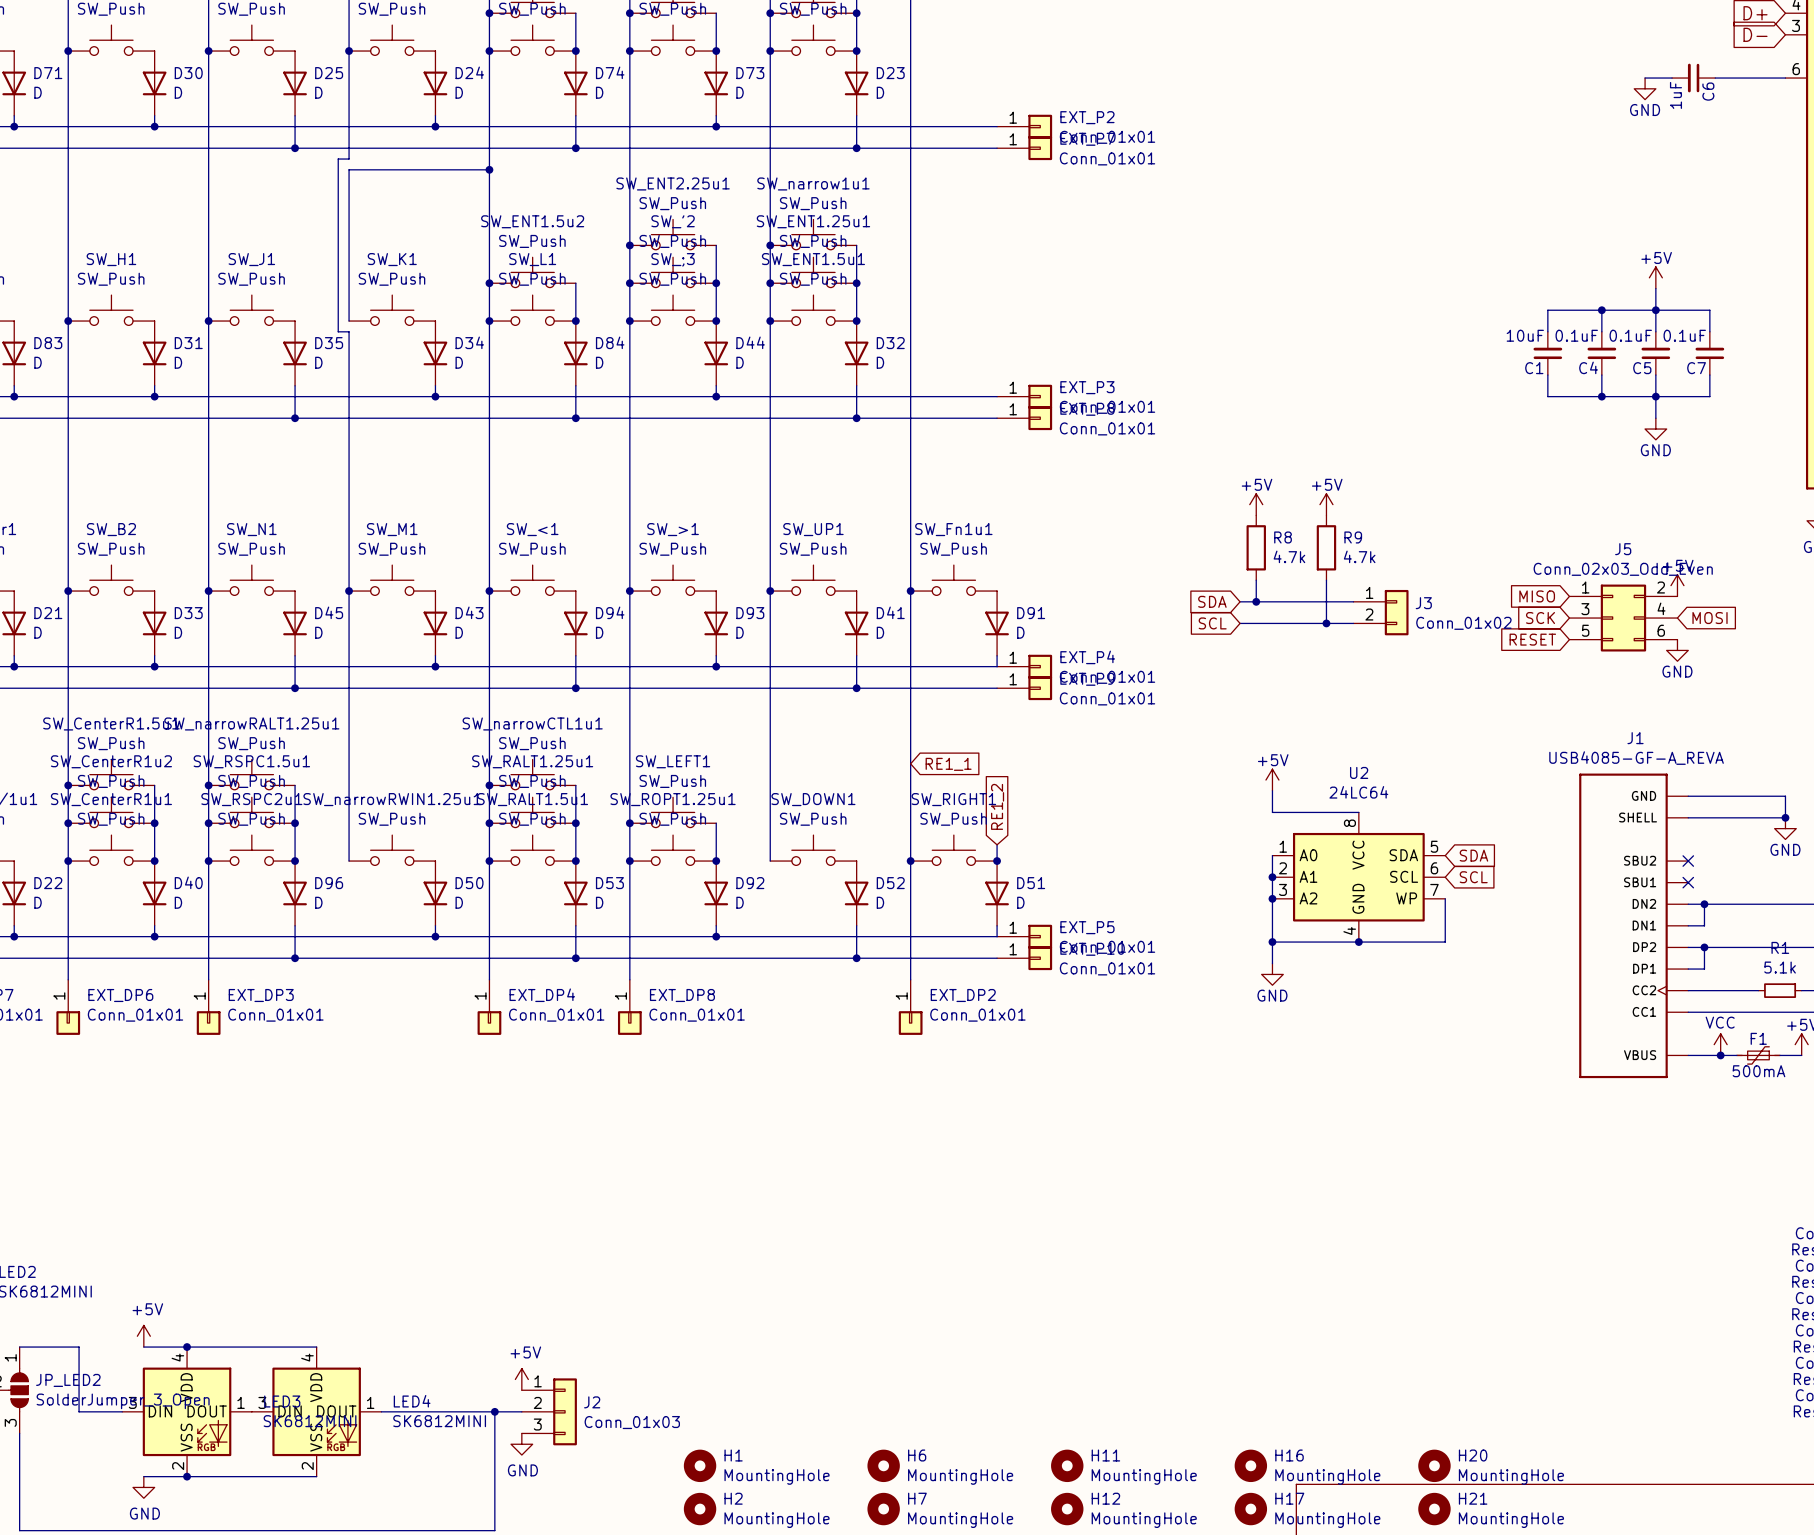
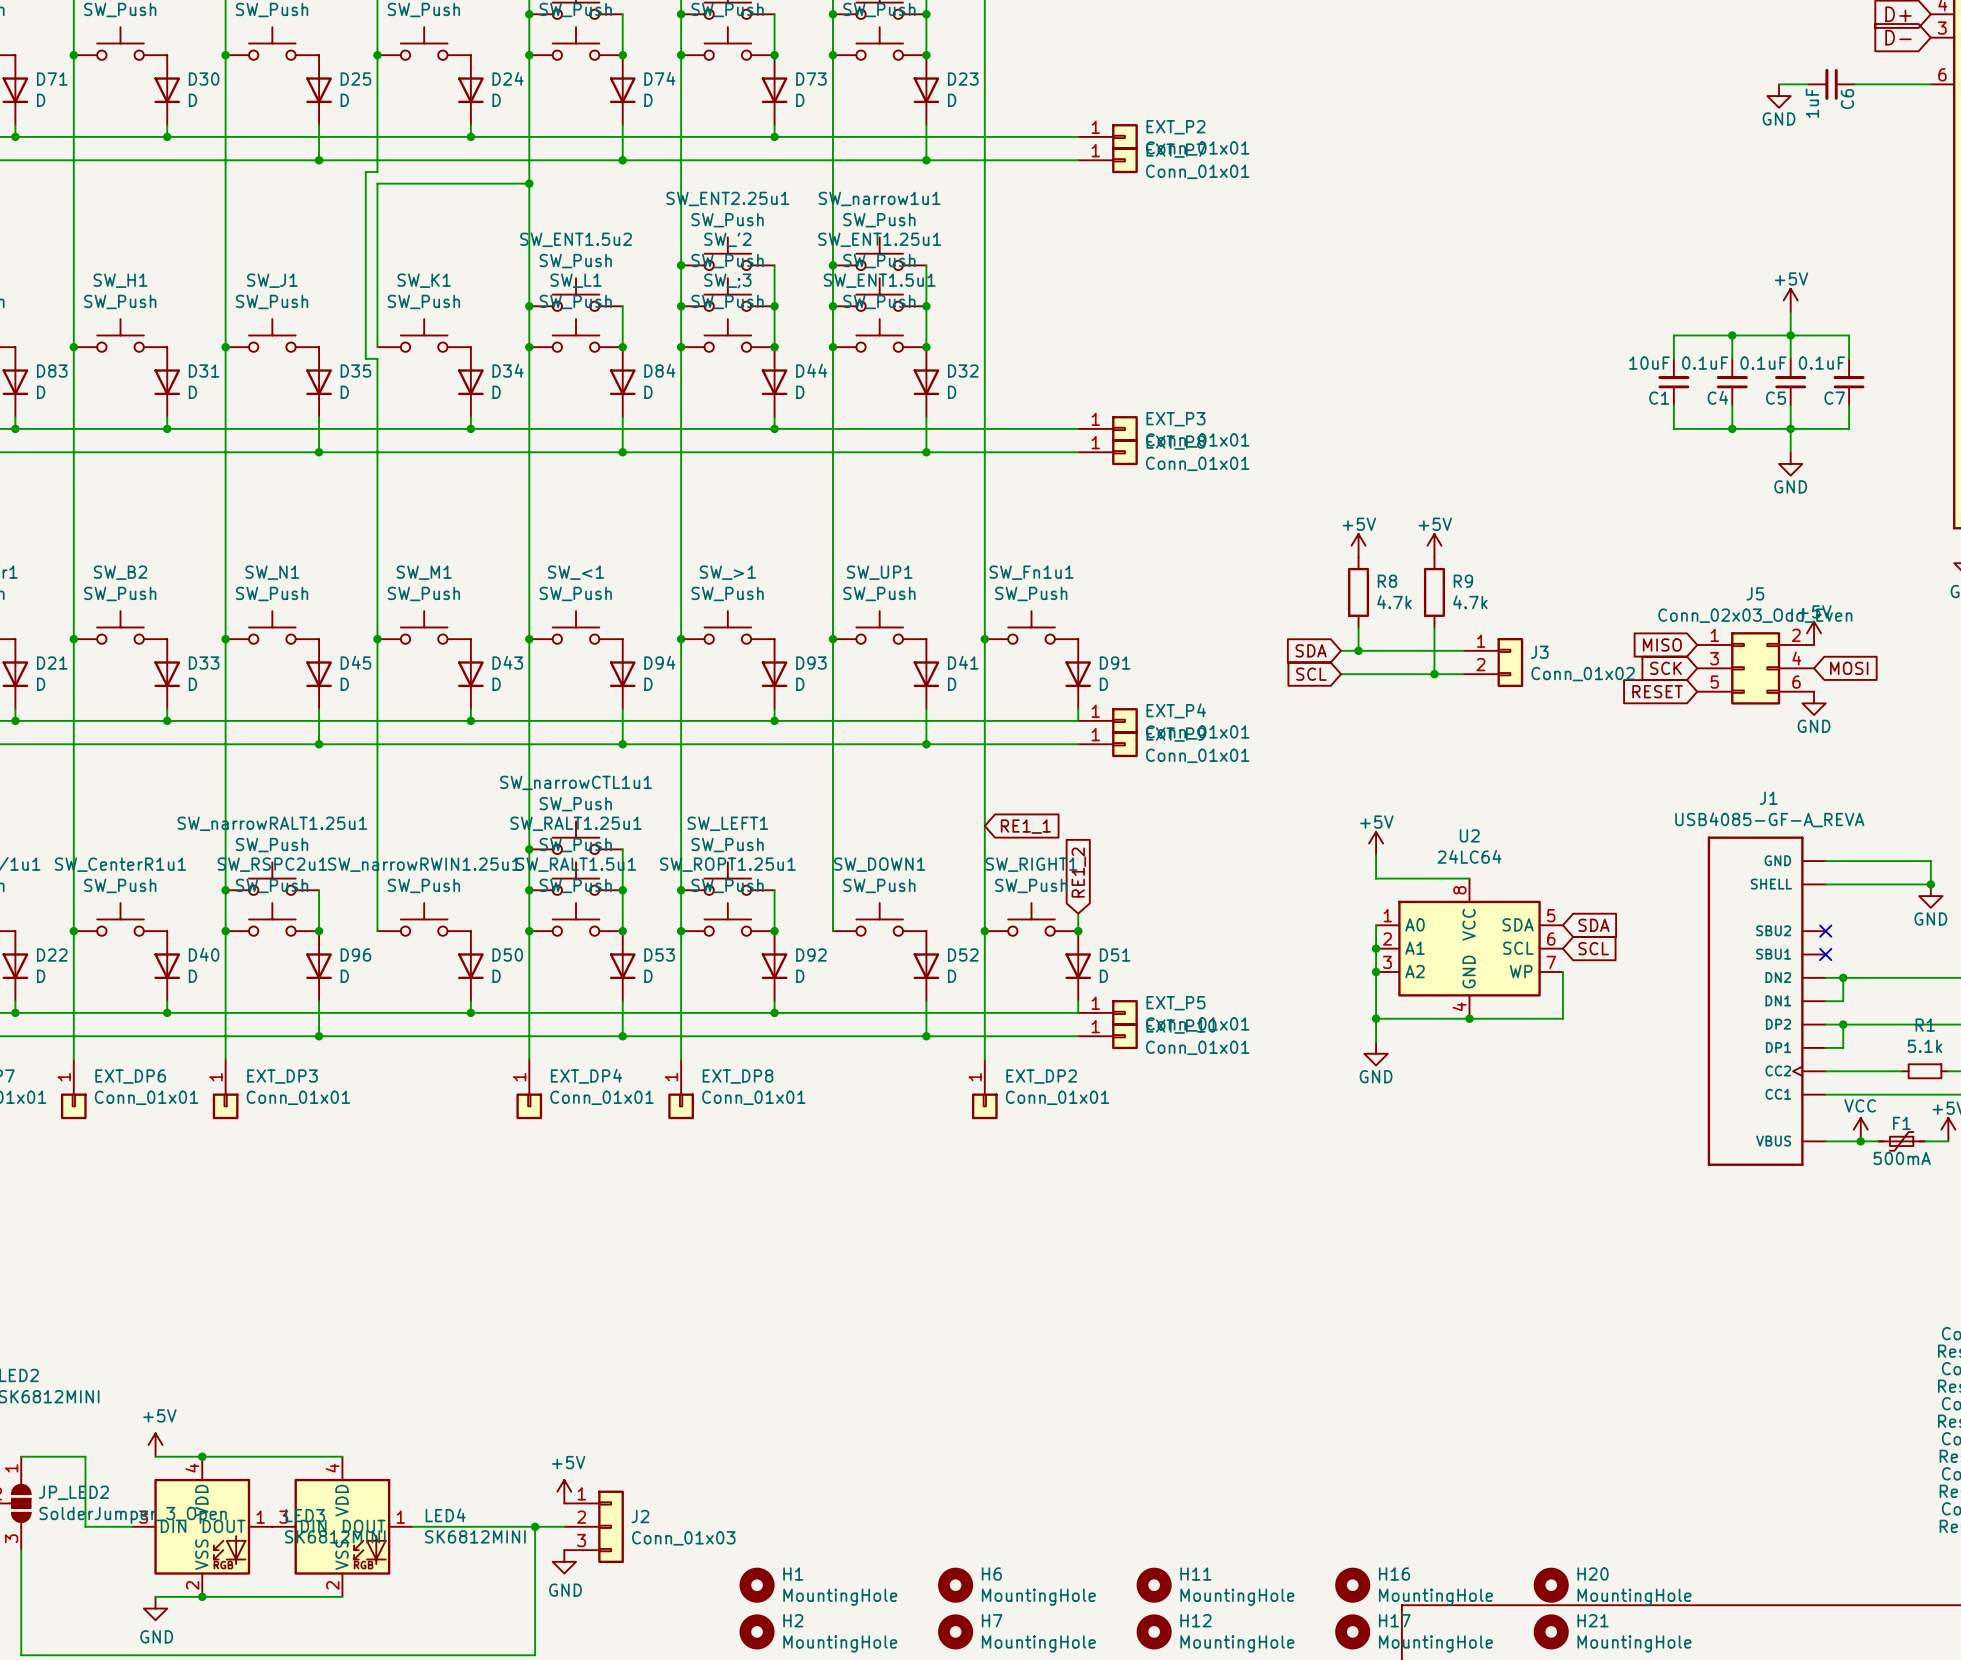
SW_RSPC1.5u1 name: SW_RSPC1.5u1 (251, 761) -> SW_narrowRALT1.25u1 (272, 823)
SW_CenterR1.5u1: SW_Push (111, 774) -> none
SW_narrowRALT1.25u1: SW_Push (251, 774) -> none
junction: (68, 785) -> none
wire: (154, 785) (154, 861) -> none
junction: (208, 785) -> none
wire: (295, 785) (295, 823) -> none
SW_CenterR1u2: SW_Push (111, 812) -> none
junction: (68, 823) -> none
junction: (154, 823) -> none
junction: (295, 823) -> none
junction: (154, 861) -> none

